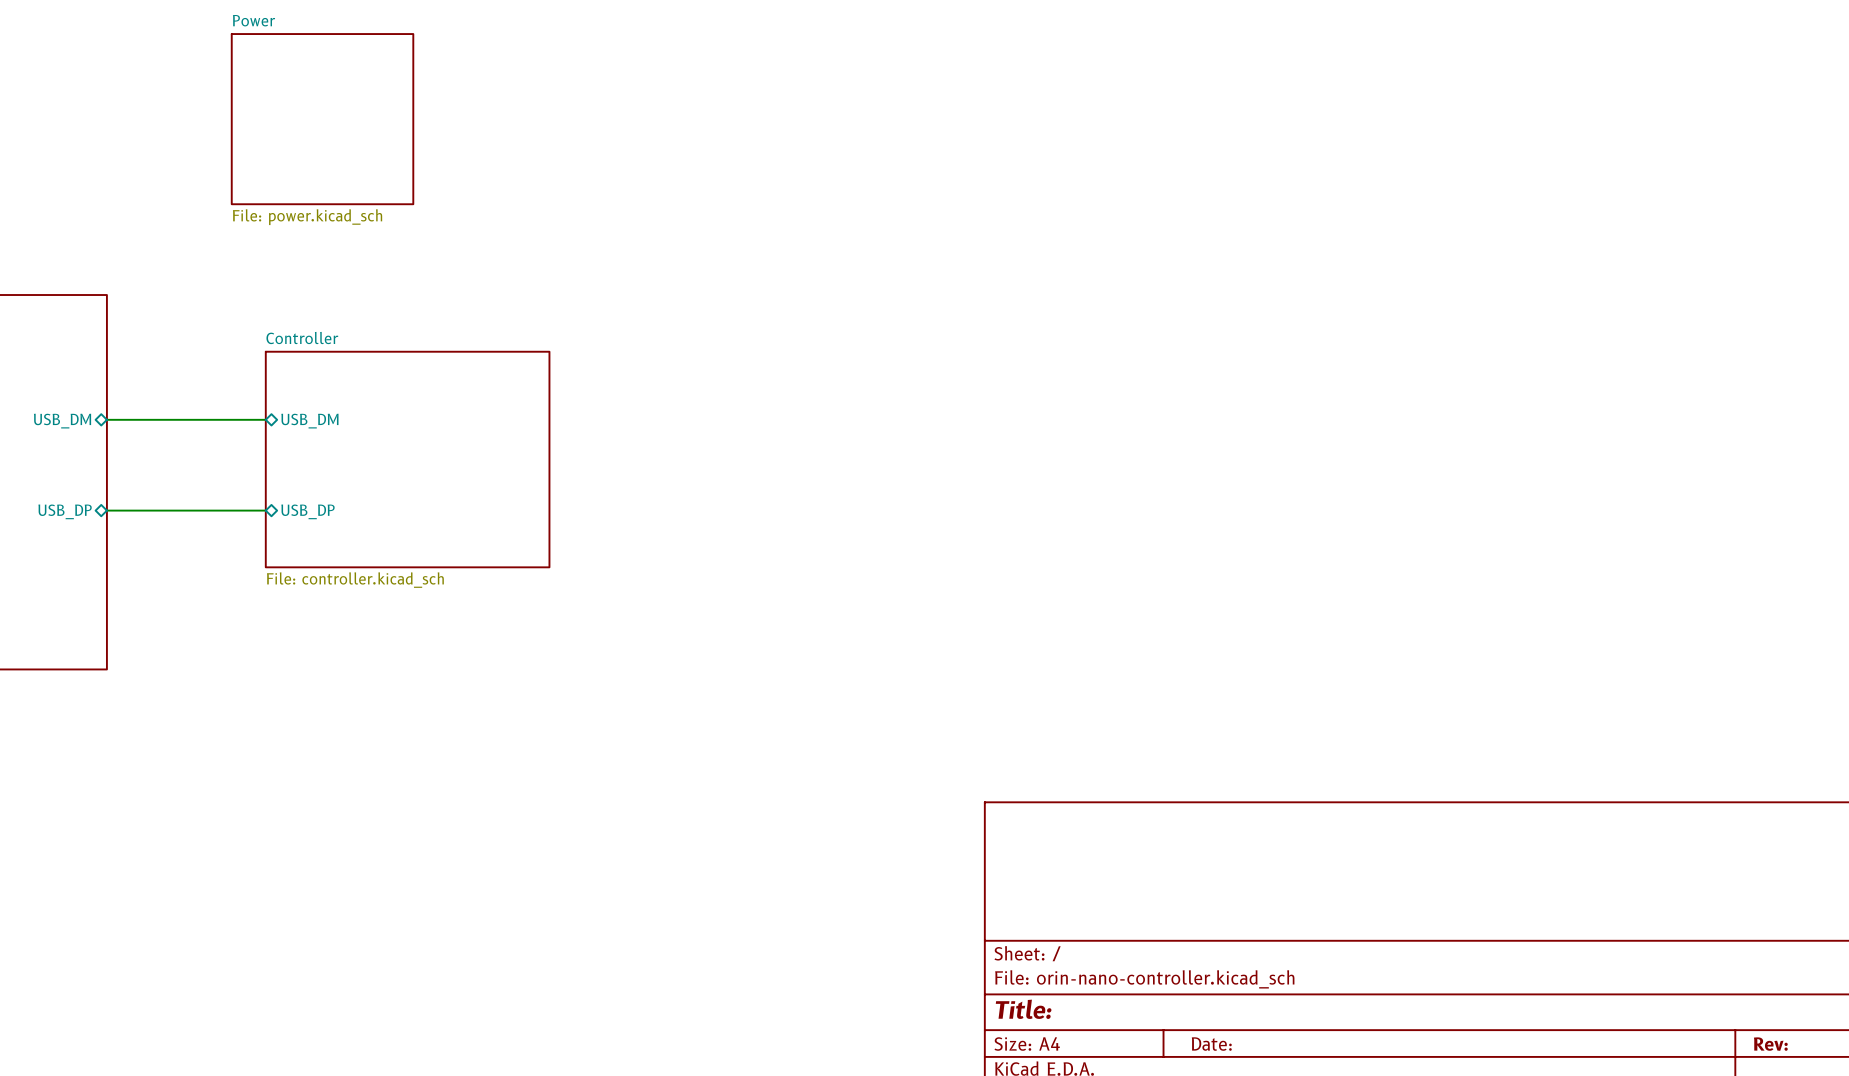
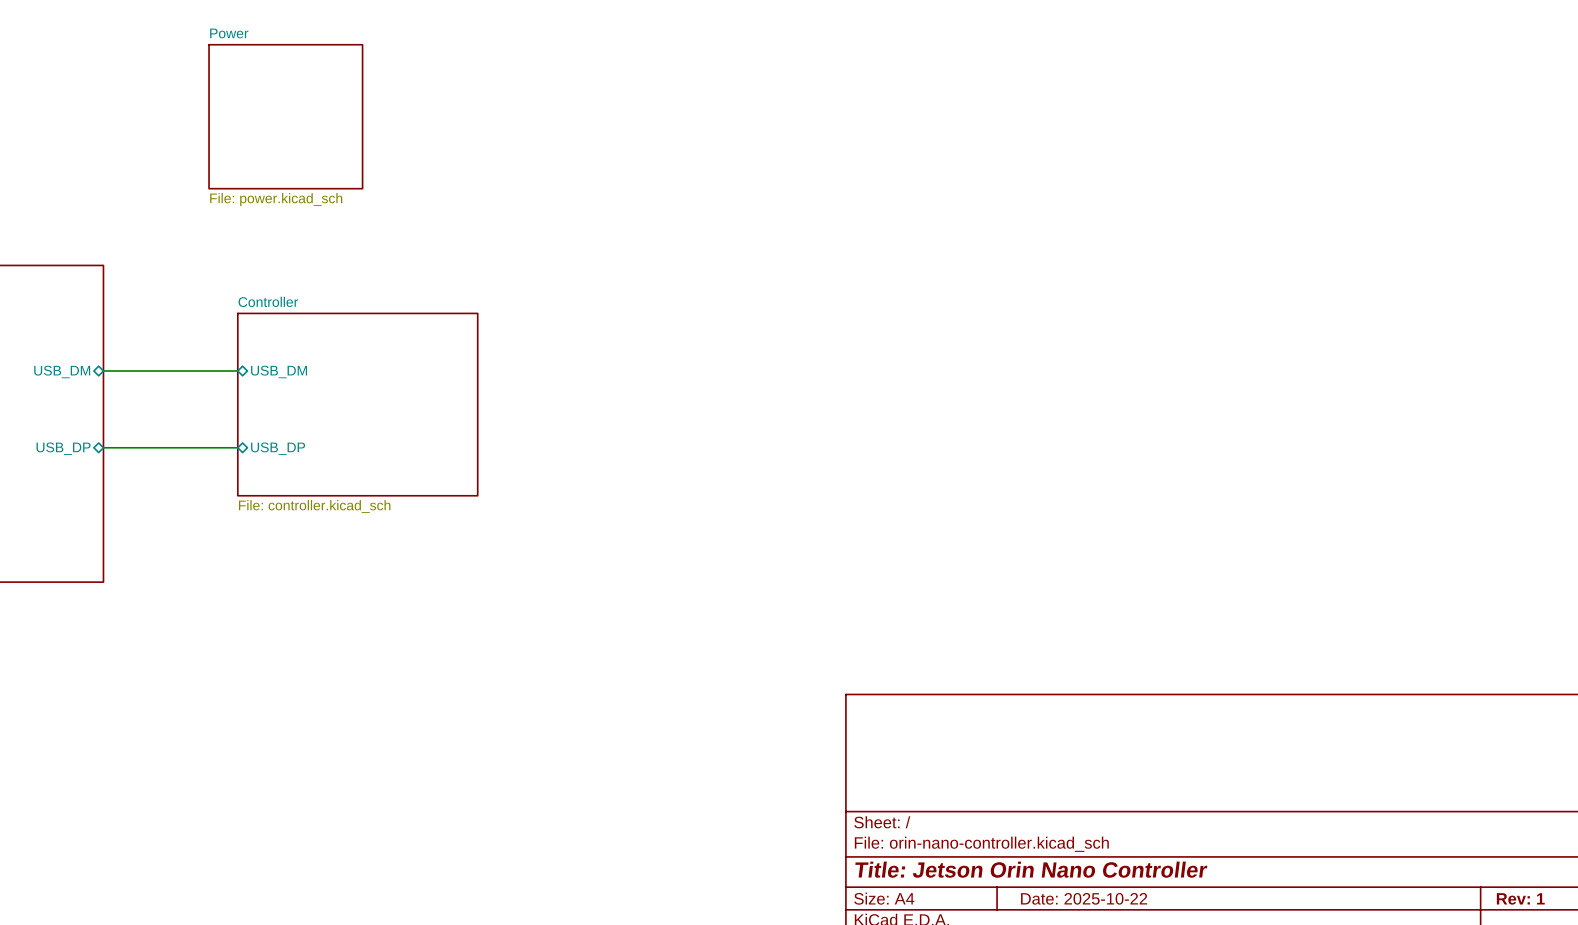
title block: Title: (1023, 1009) -> Title: Jetson Orin Nano Controller (1031, 869)
title block: Date: (1211, 1044) -> Date: 2025-10-22 (1084, 898)
title block: Rev: (1770, 1044) -> Rev: 1 (1520, 898)

